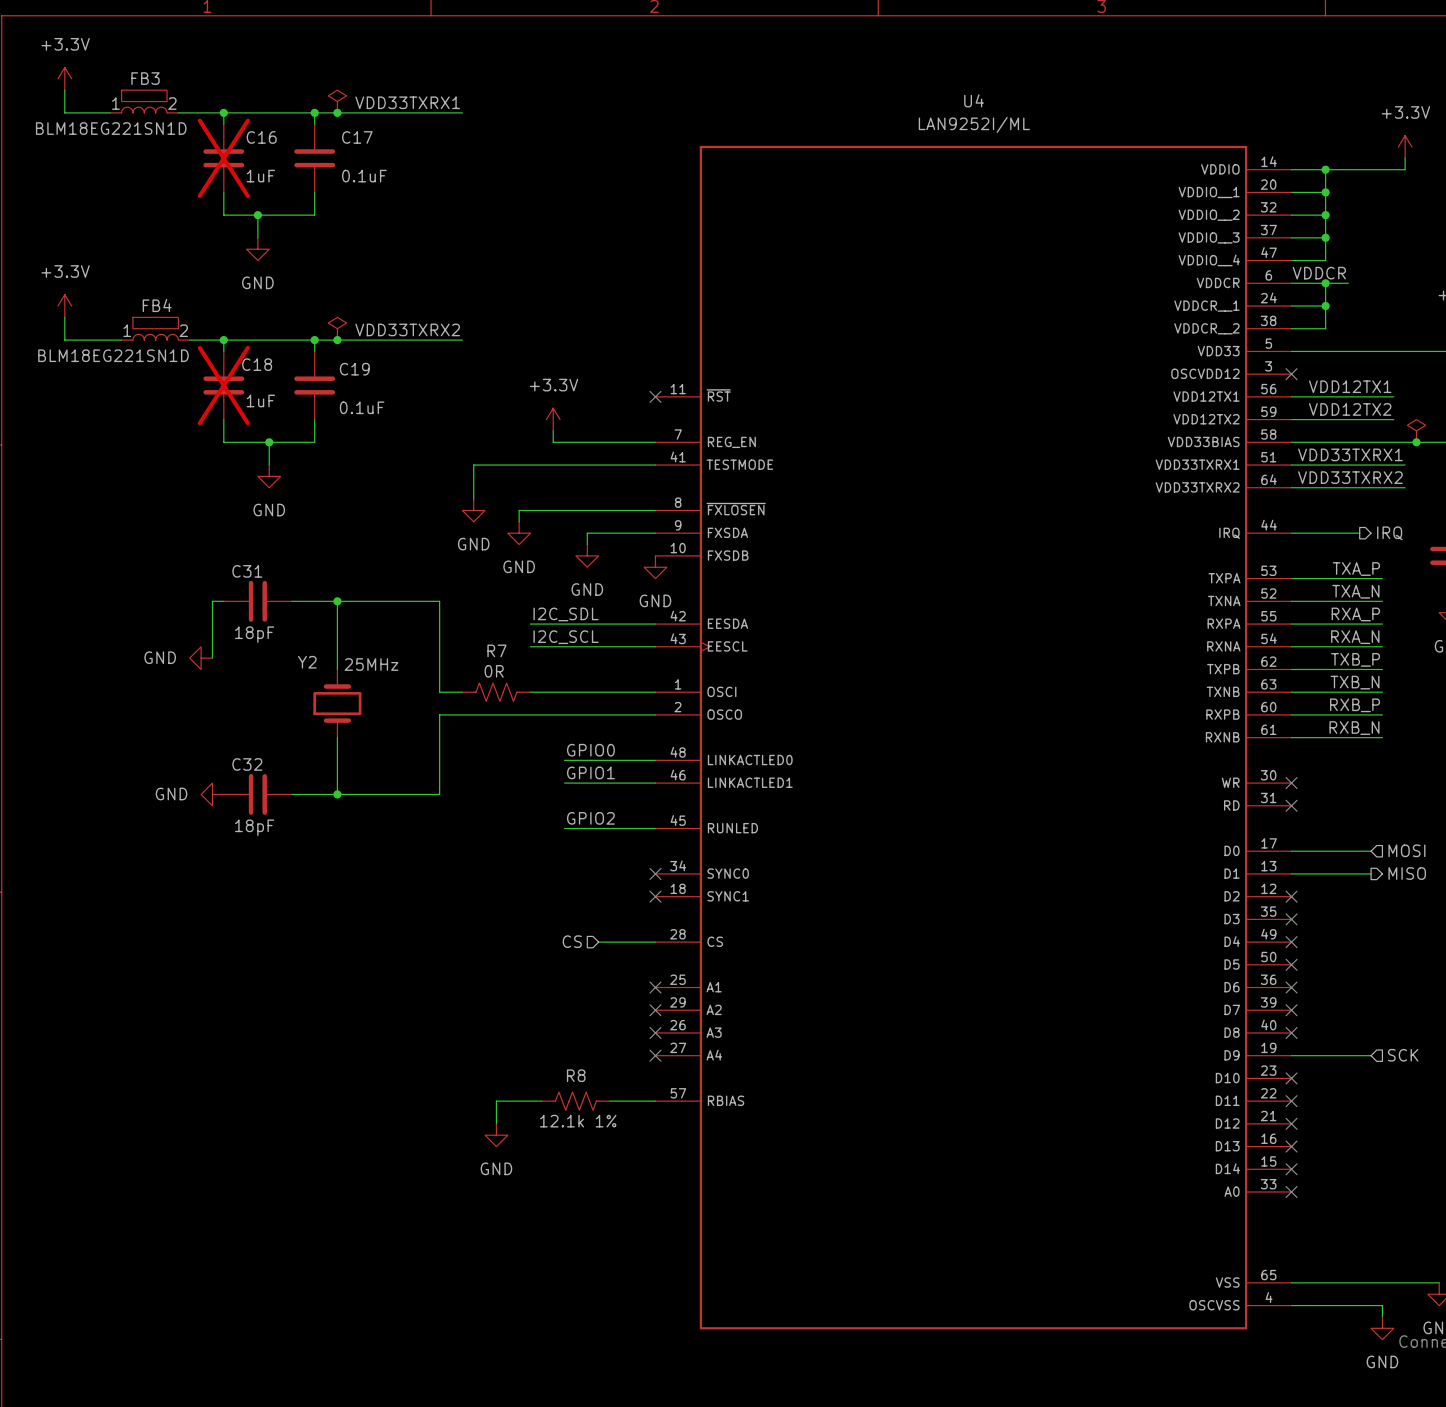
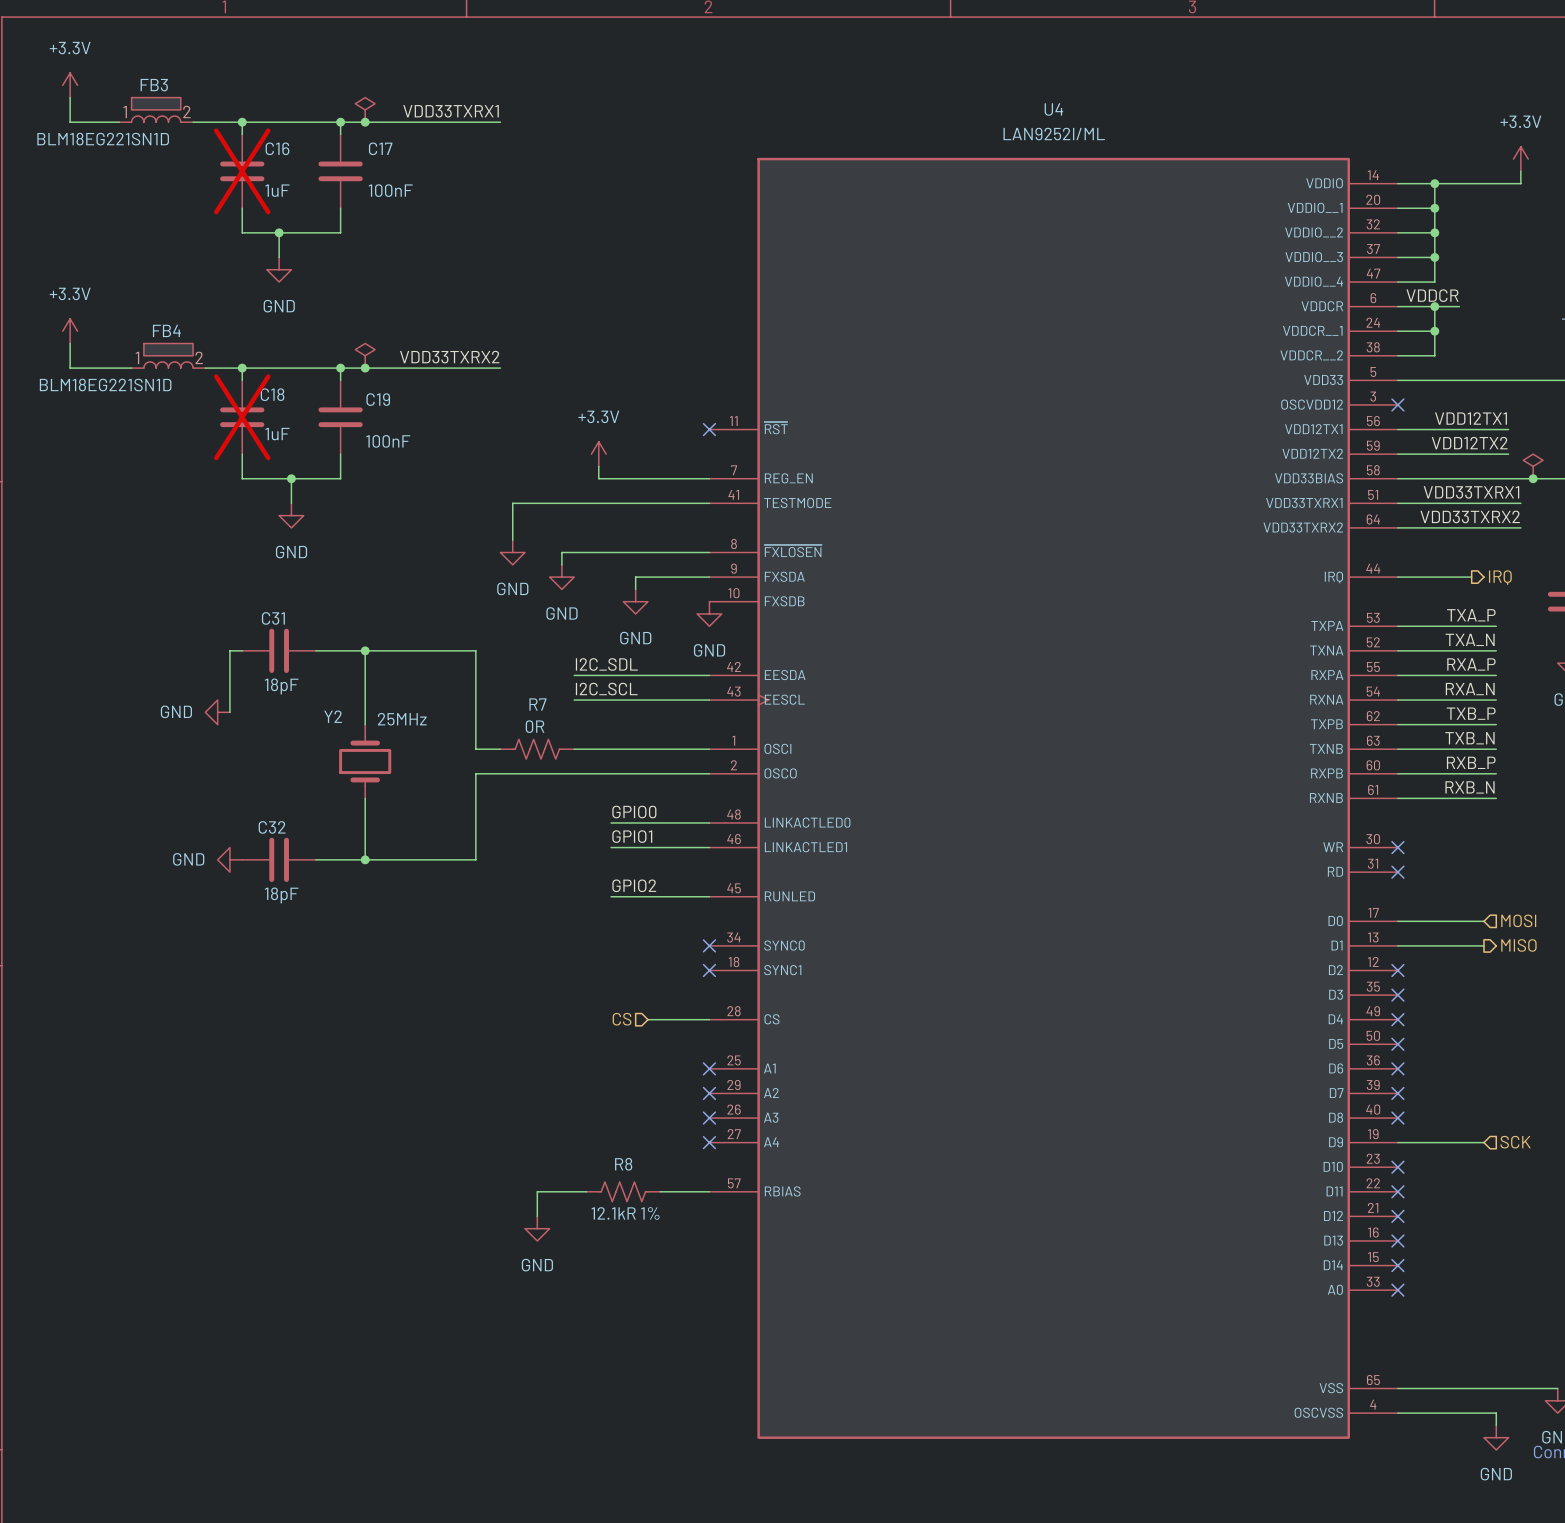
C17 value: 0.1uF (364, 176) -> 100nF (390, 190)
C19 value: 0.1uF (362, 407) -> 100nF (388, 441)
R8 value: 12.1k 1% (578, 1121) -> 12.1kR 1% (625, 1213)

